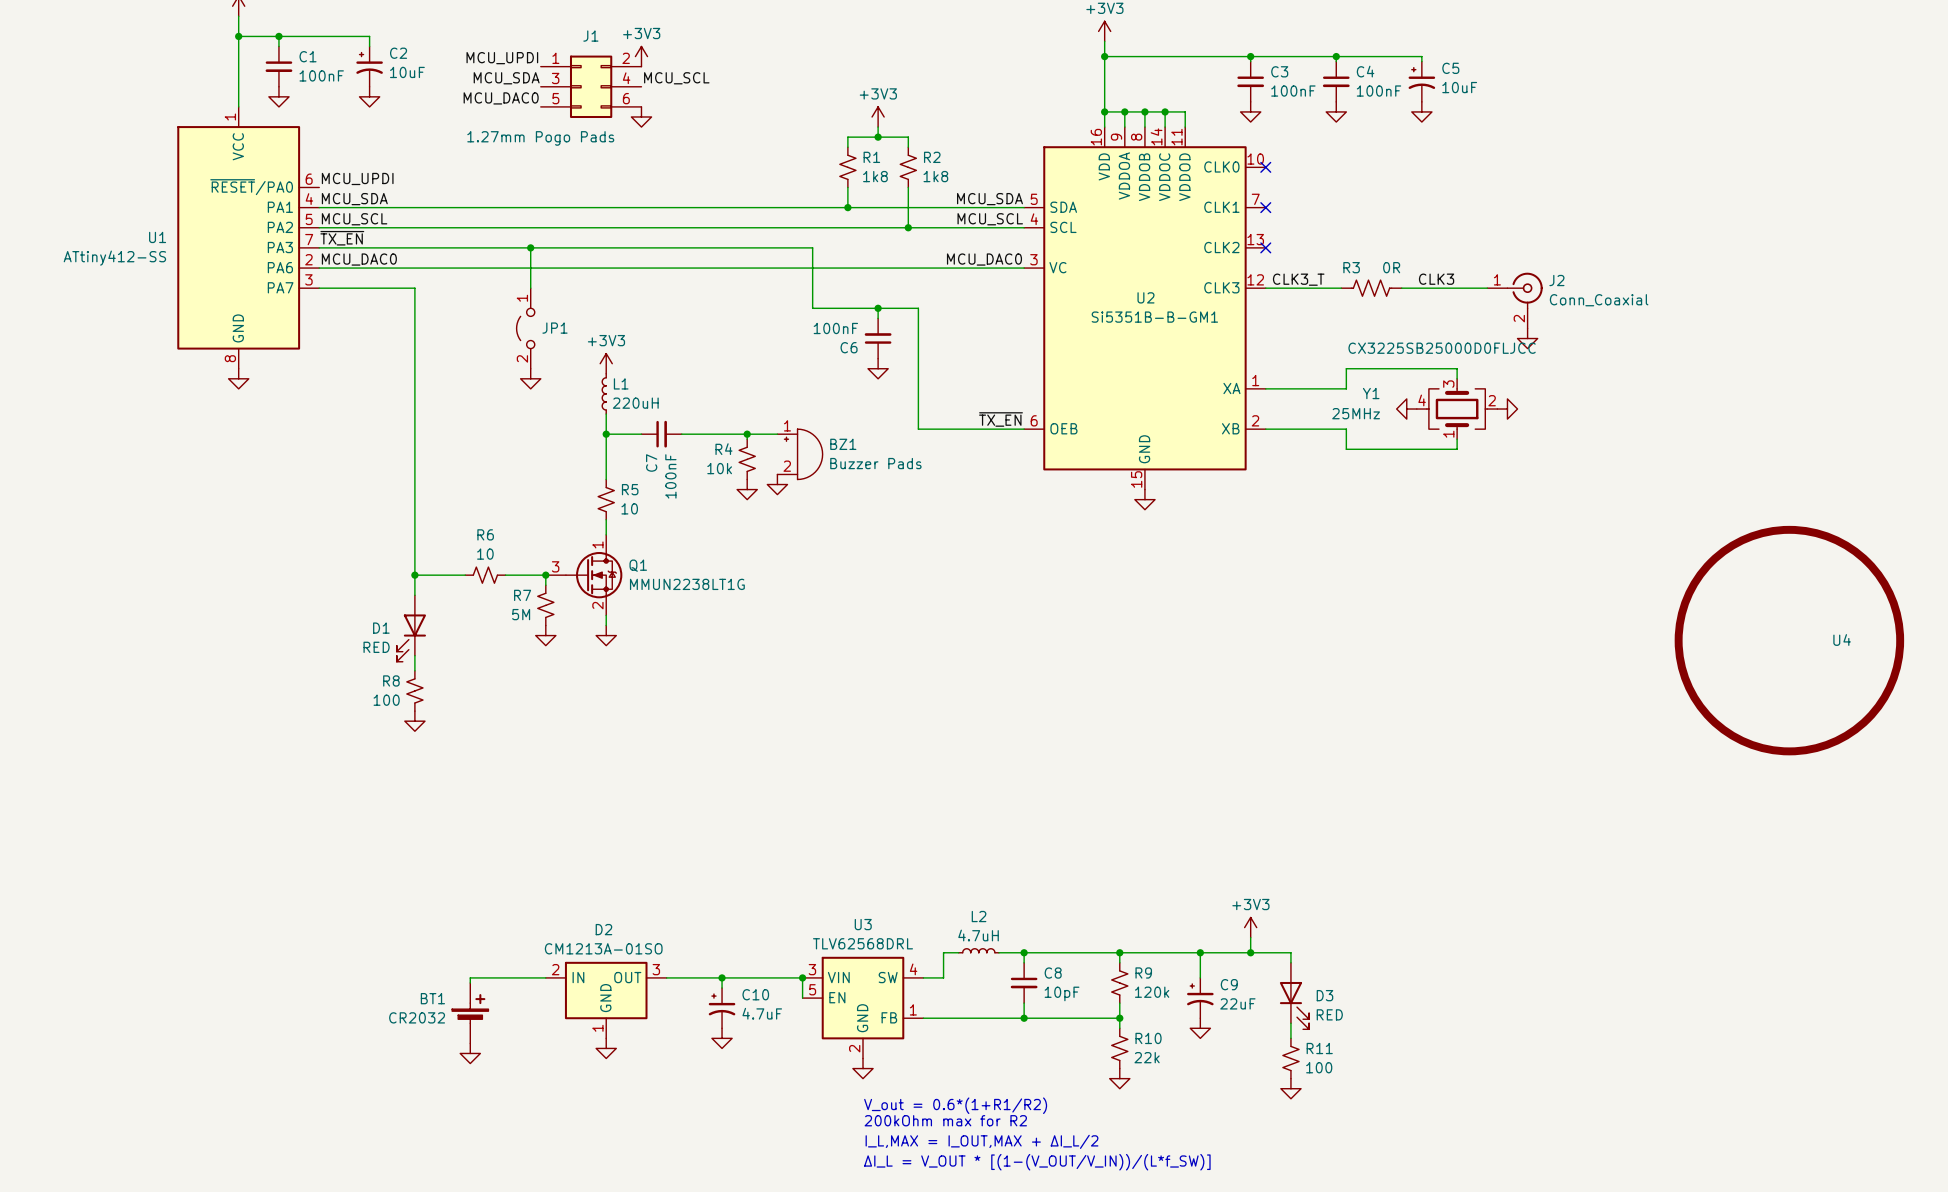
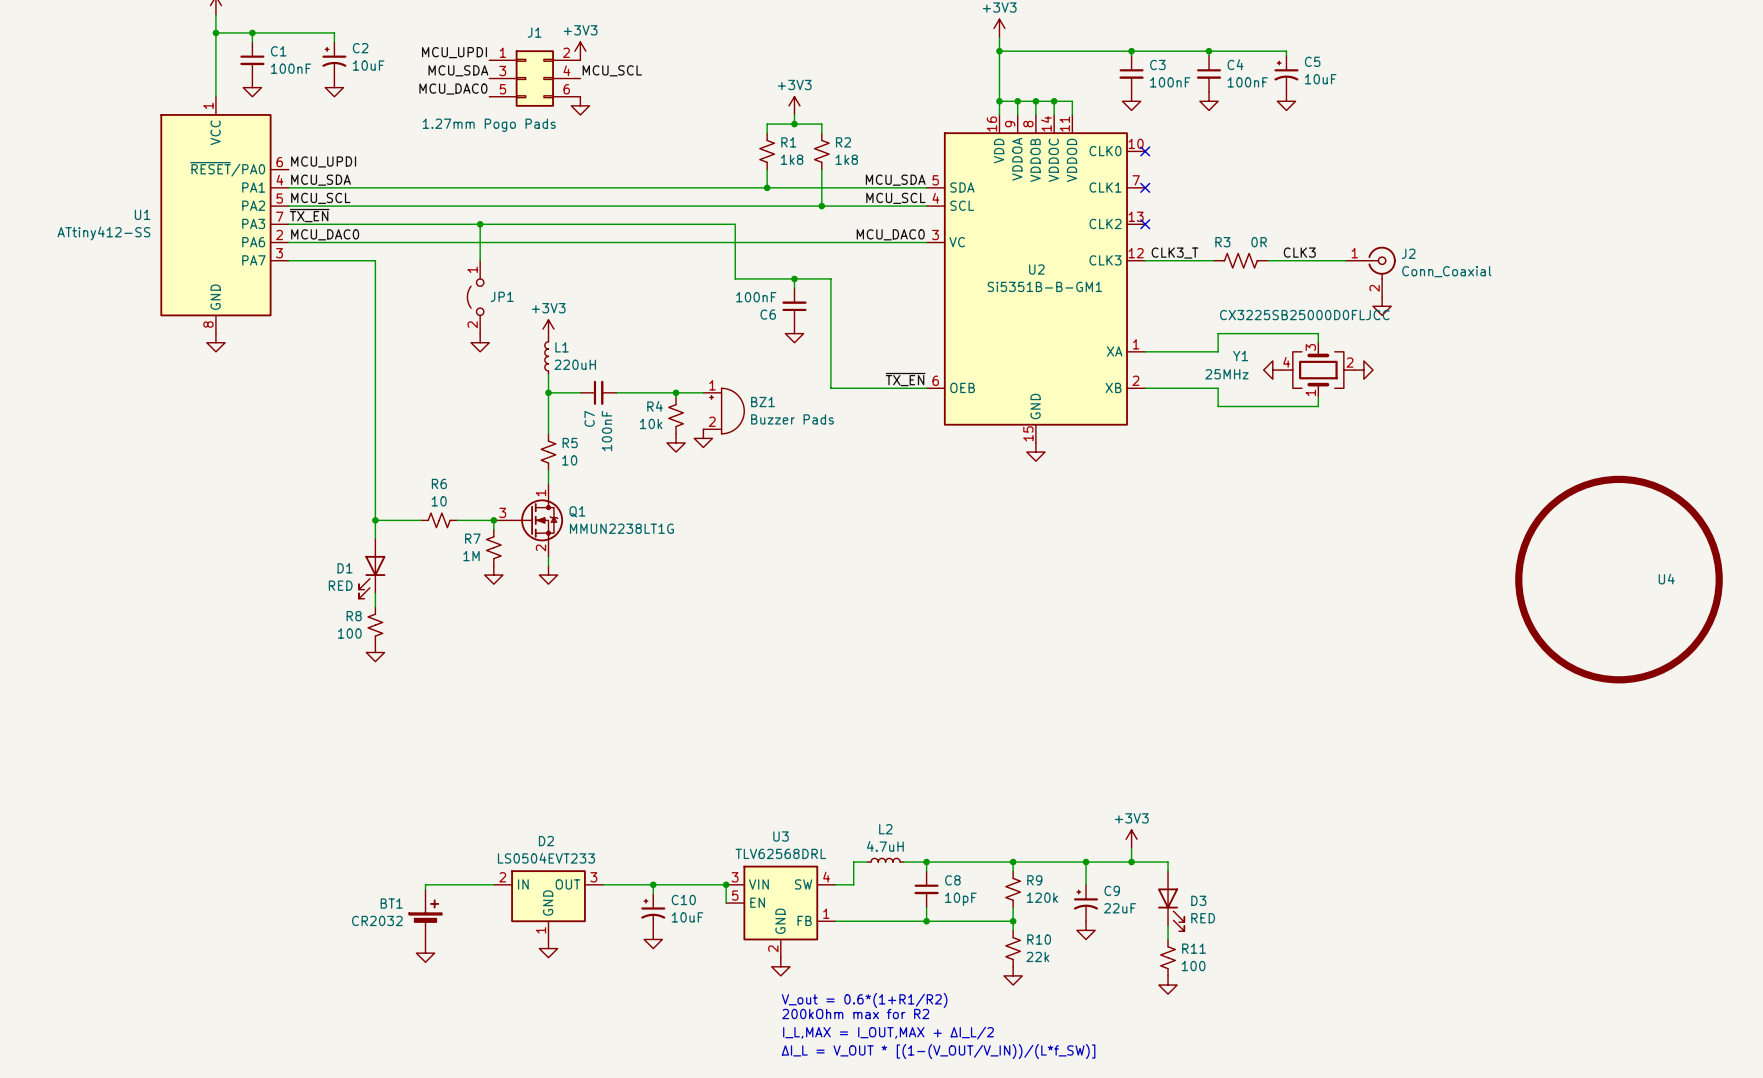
R7 value: 5M (521, 614) -> 1M (471, 556)
D2 value: CM1213A-01SO (603, 948) -> LS0504EVT233 (546, 858)
C10 value: 4.7uF (762, 1013) -> 10uF (687, 917)

